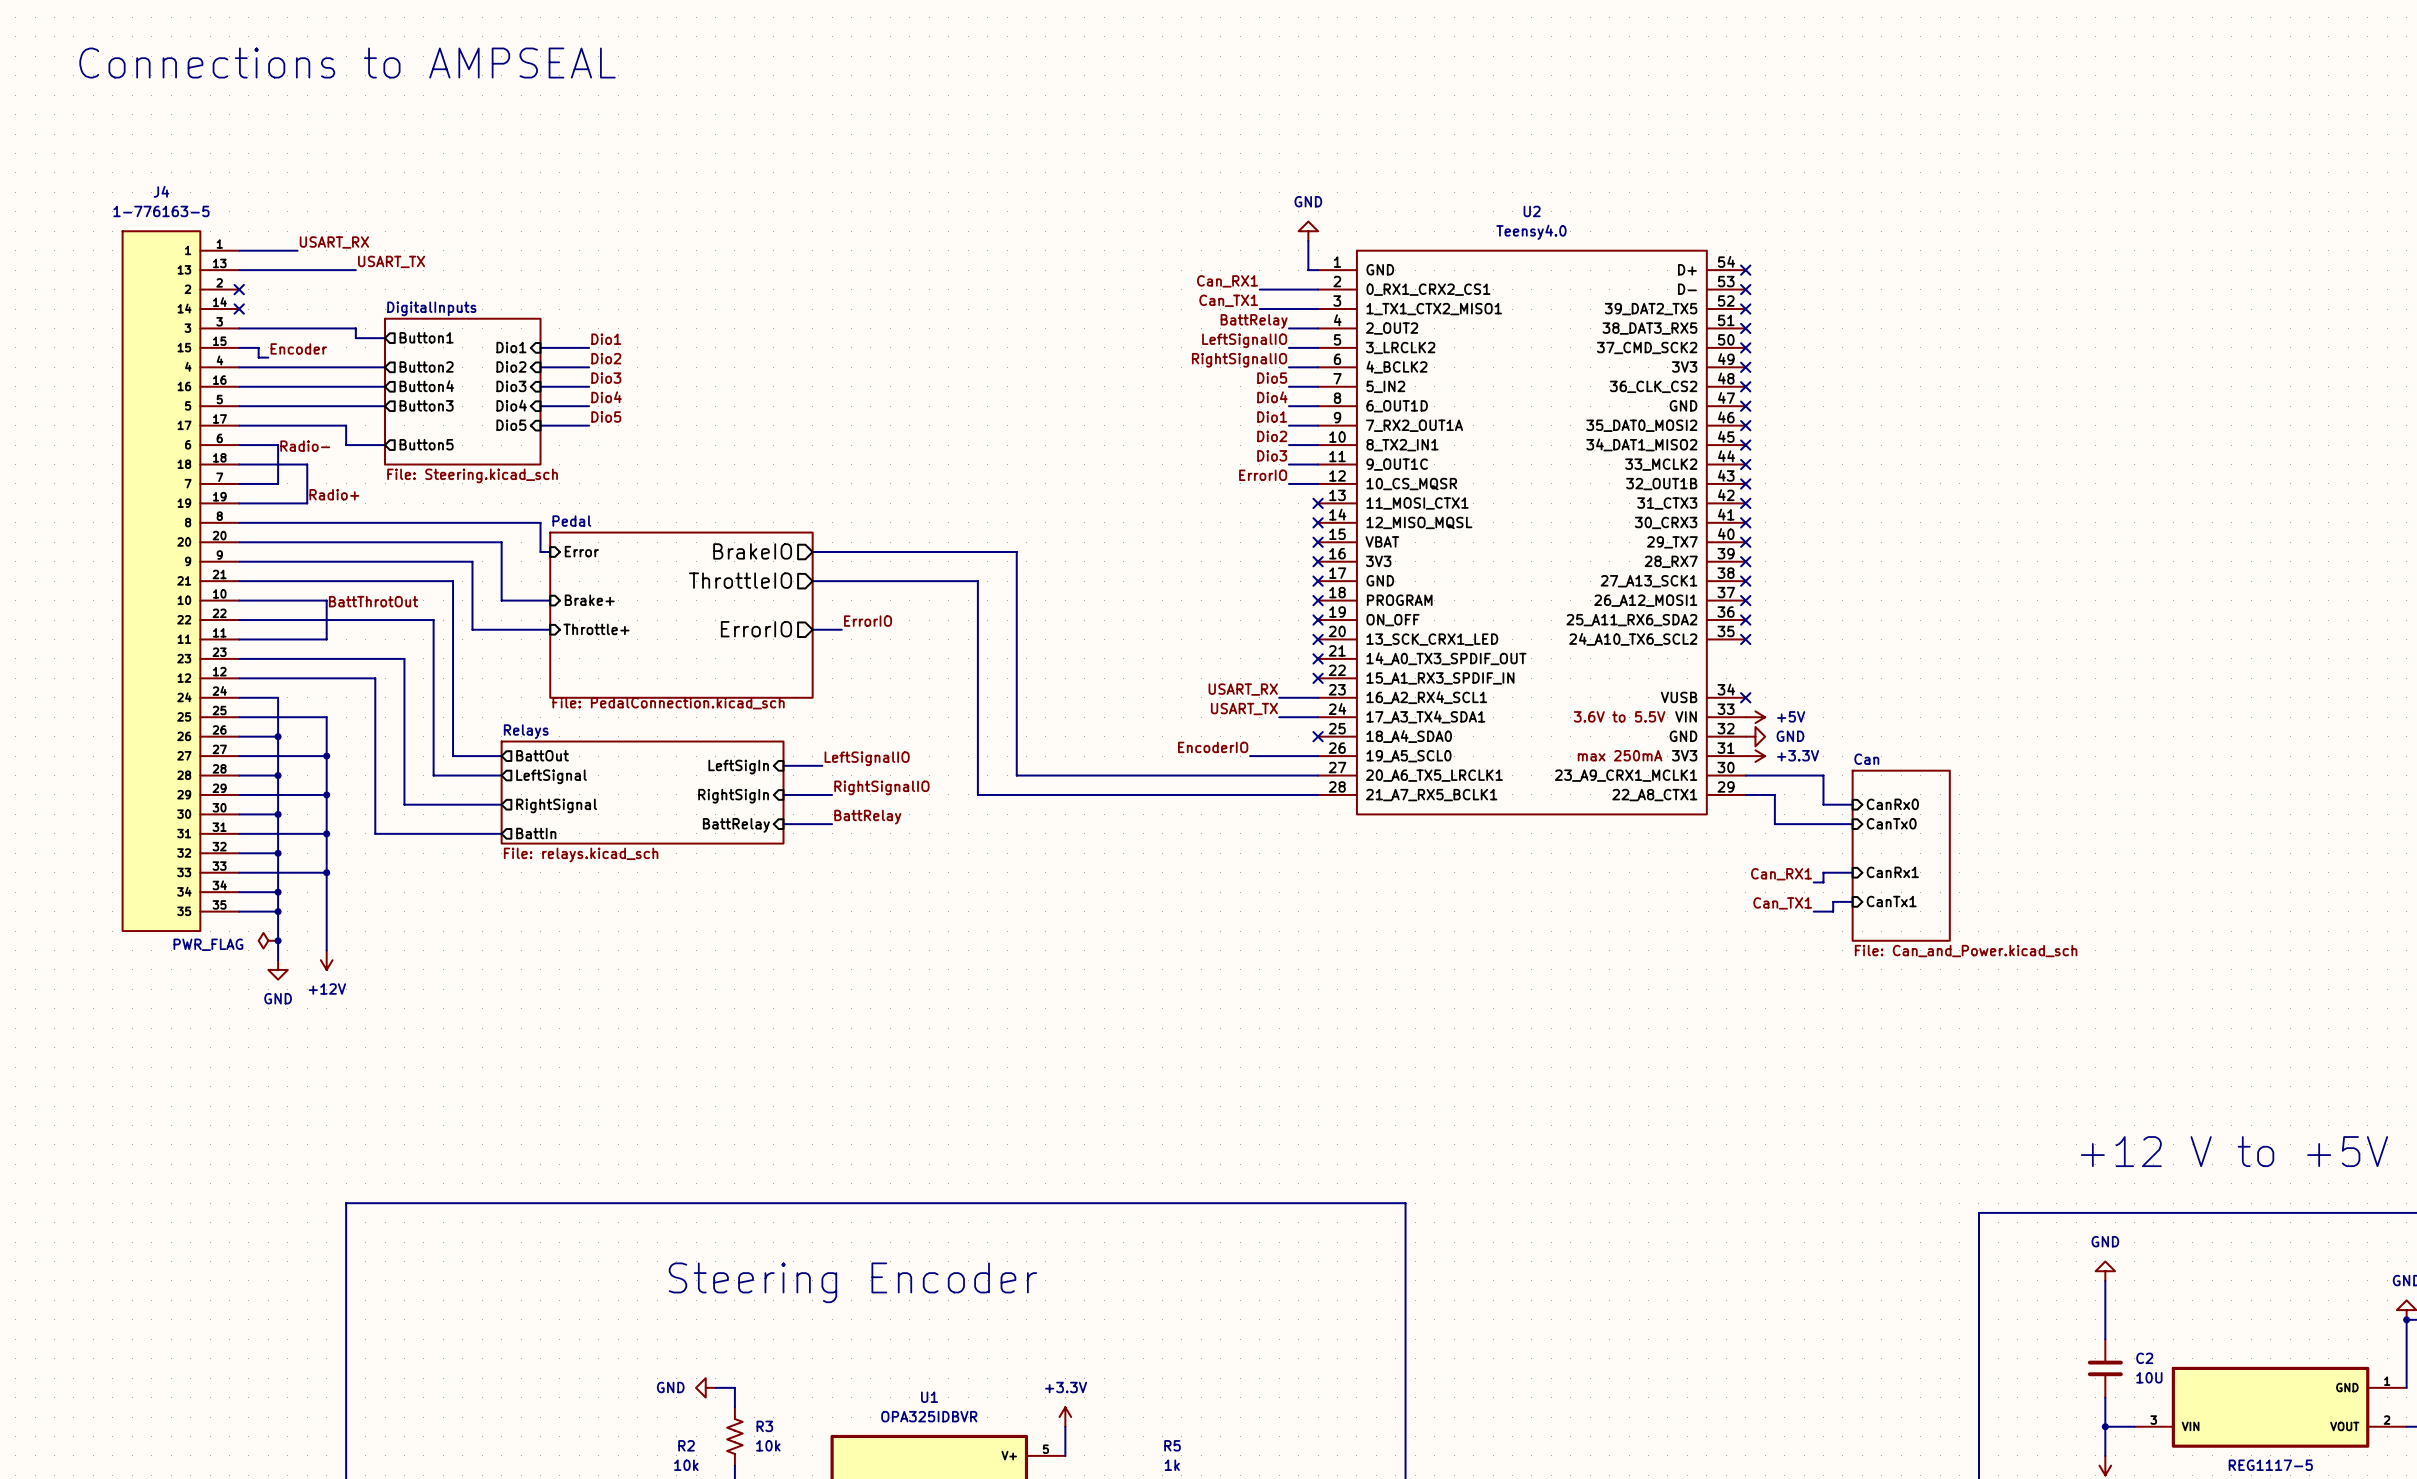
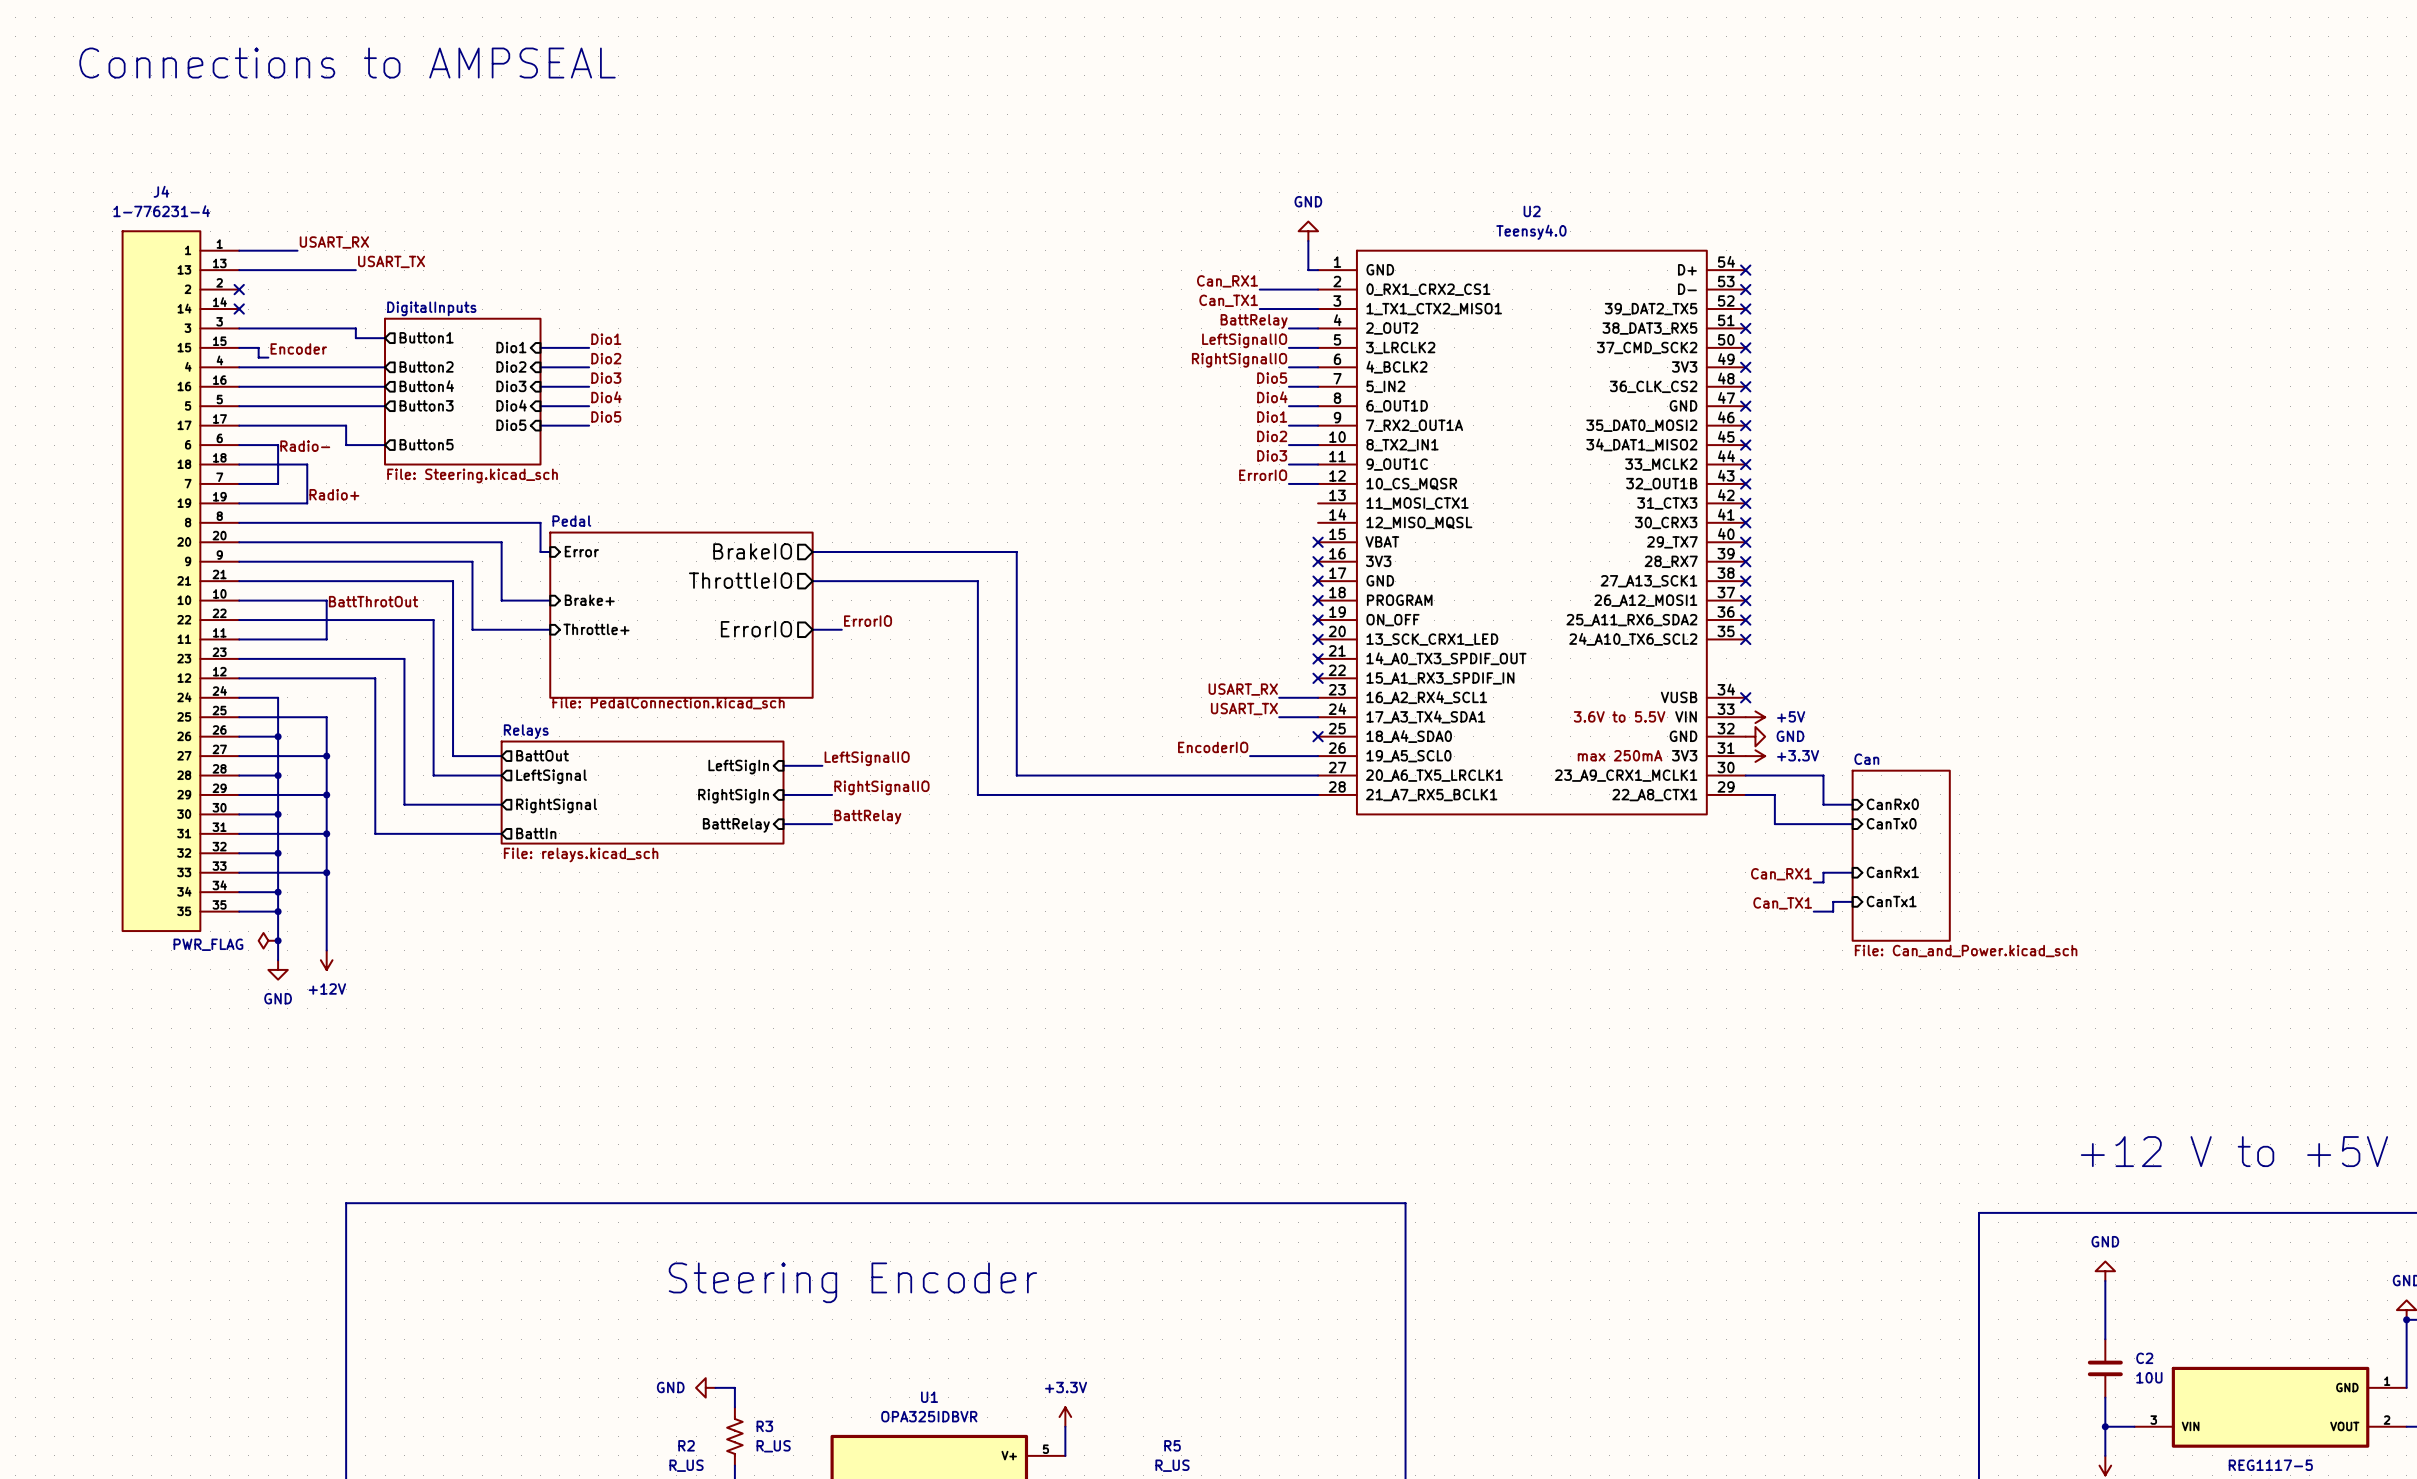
J4 value: 1-776163-5 (161, 211) -> 1-776231-4 (161, 211)
no-connect mark: (1318, 503) -> none
no-connect mark: (1318, 522) -> none
R3 value: 10k (768, 1445) -> R_US (773, 1446)
R2 value: 10k (686, 1465) -> R_US (686, 1465)
R5 value: 1k (1172, 1465) -> R_US (1172, 1465)

